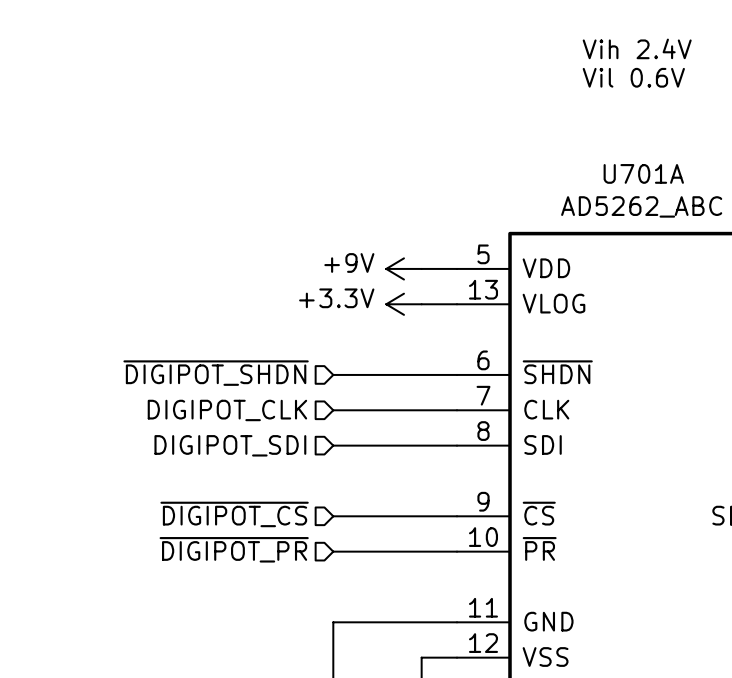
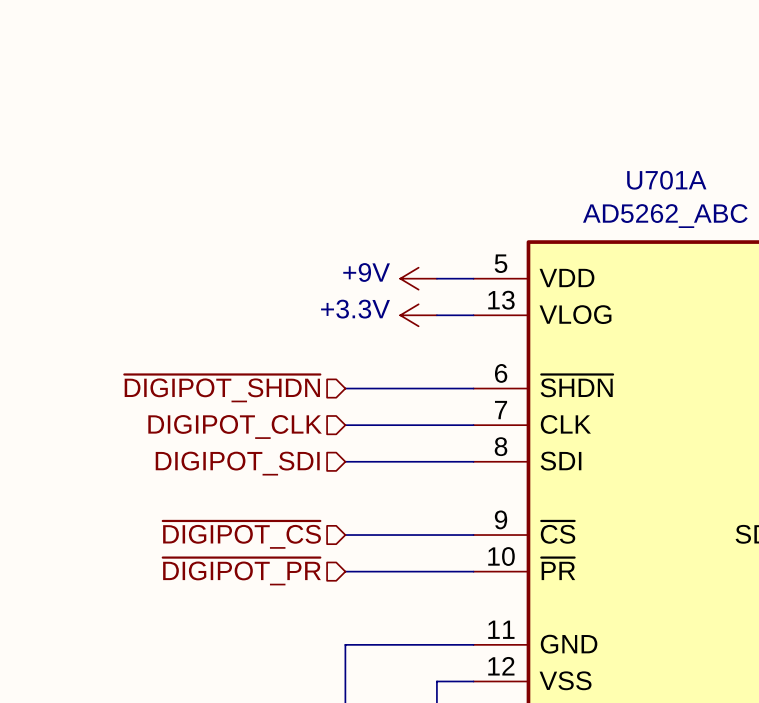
text: Vih 2.4V (637, 48) -> none
text: Vil 0.6V (633, 77) -> none

